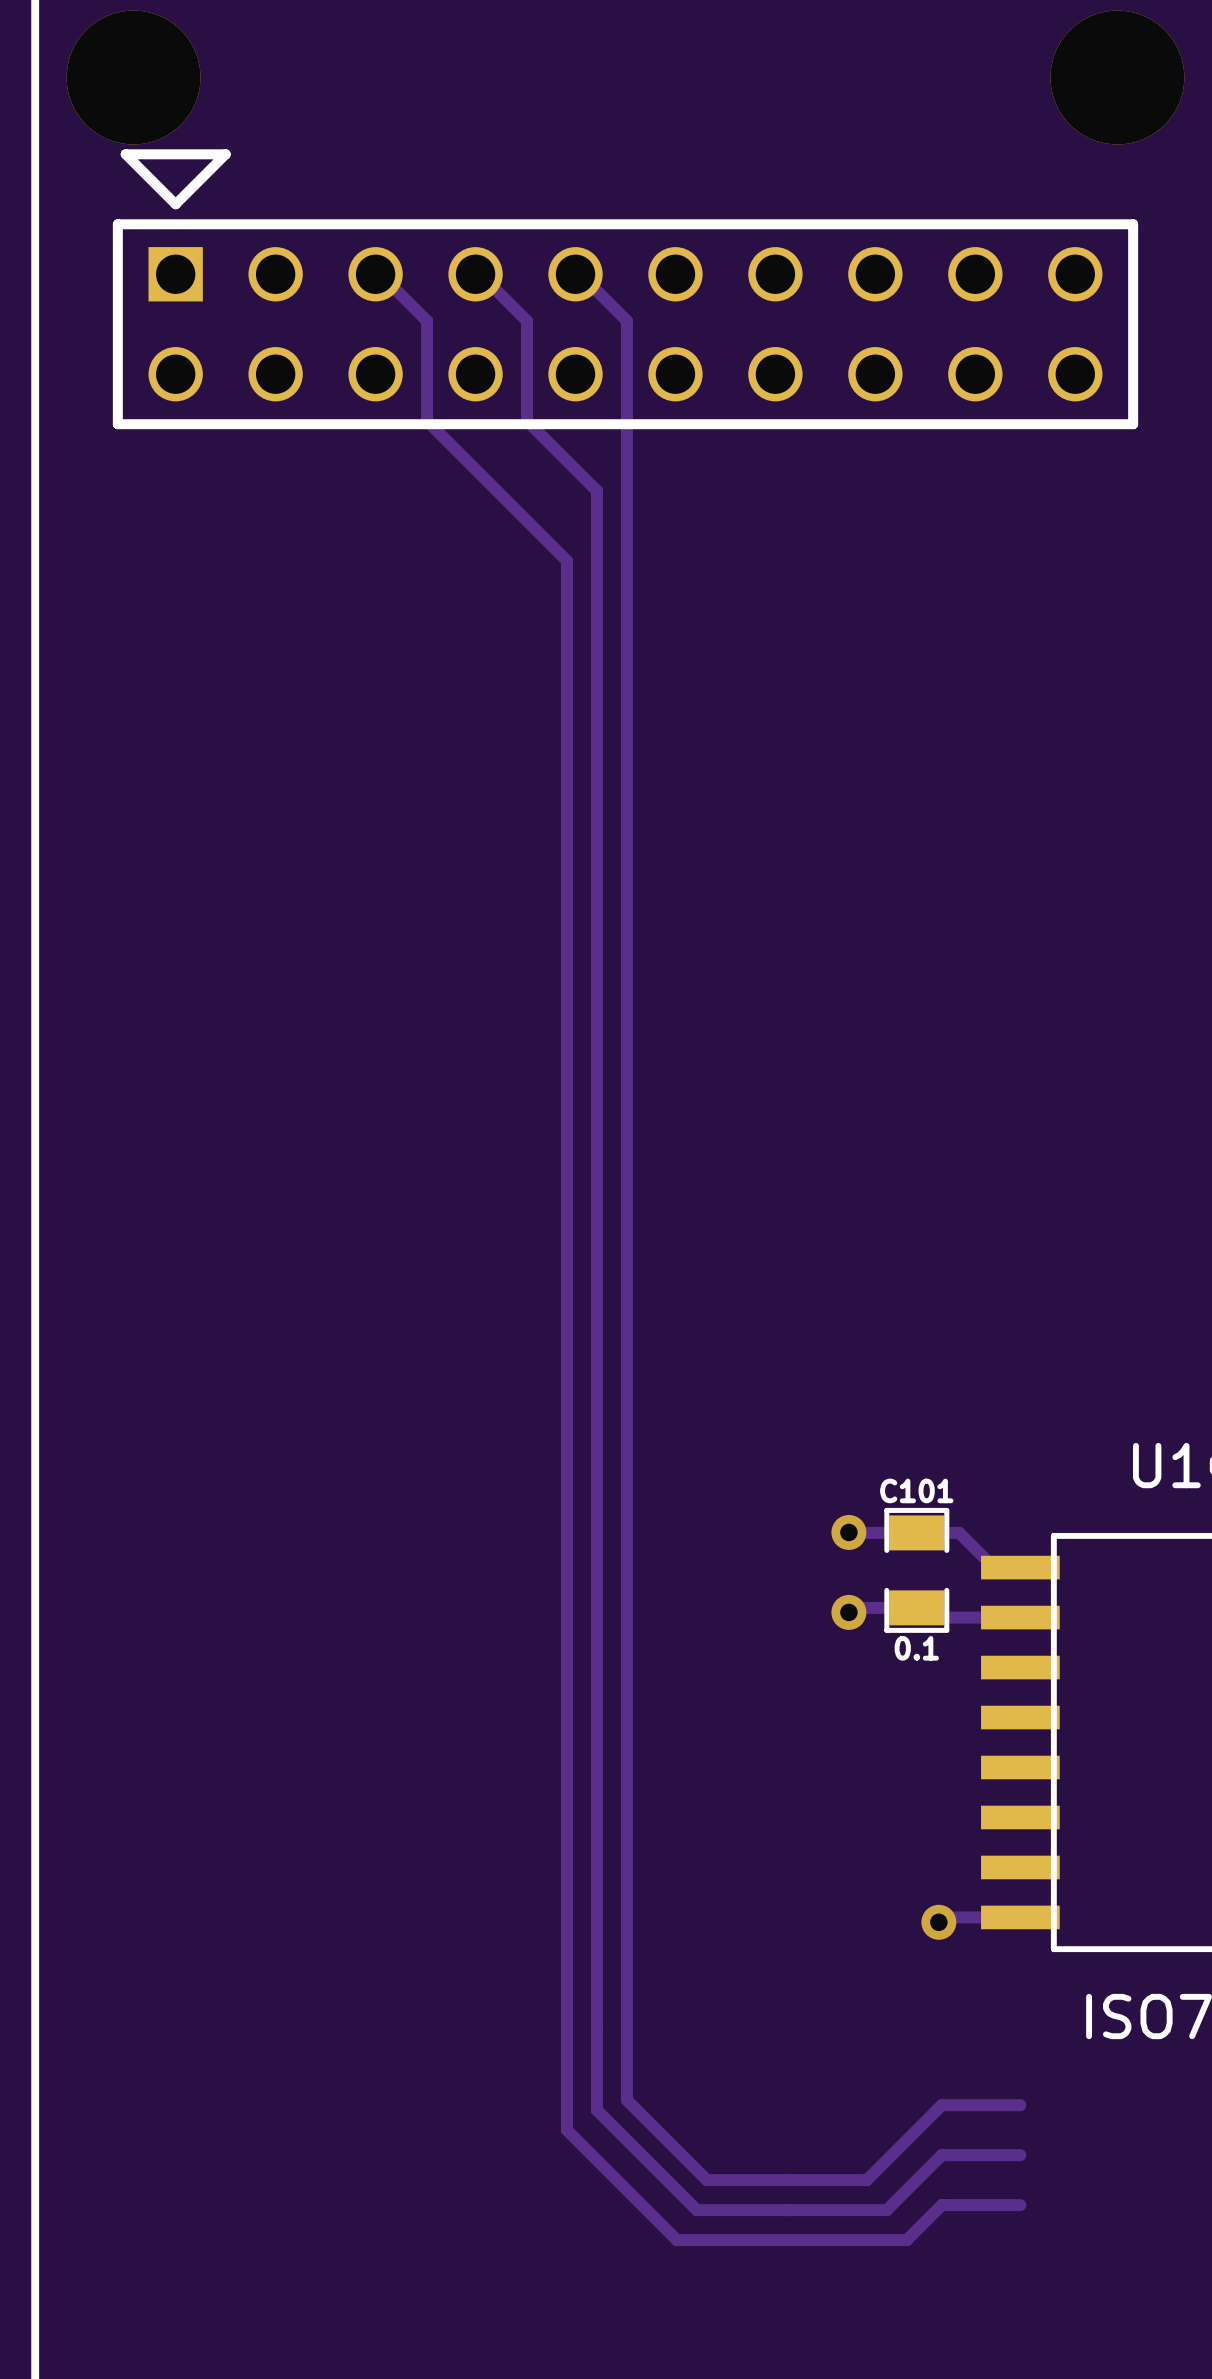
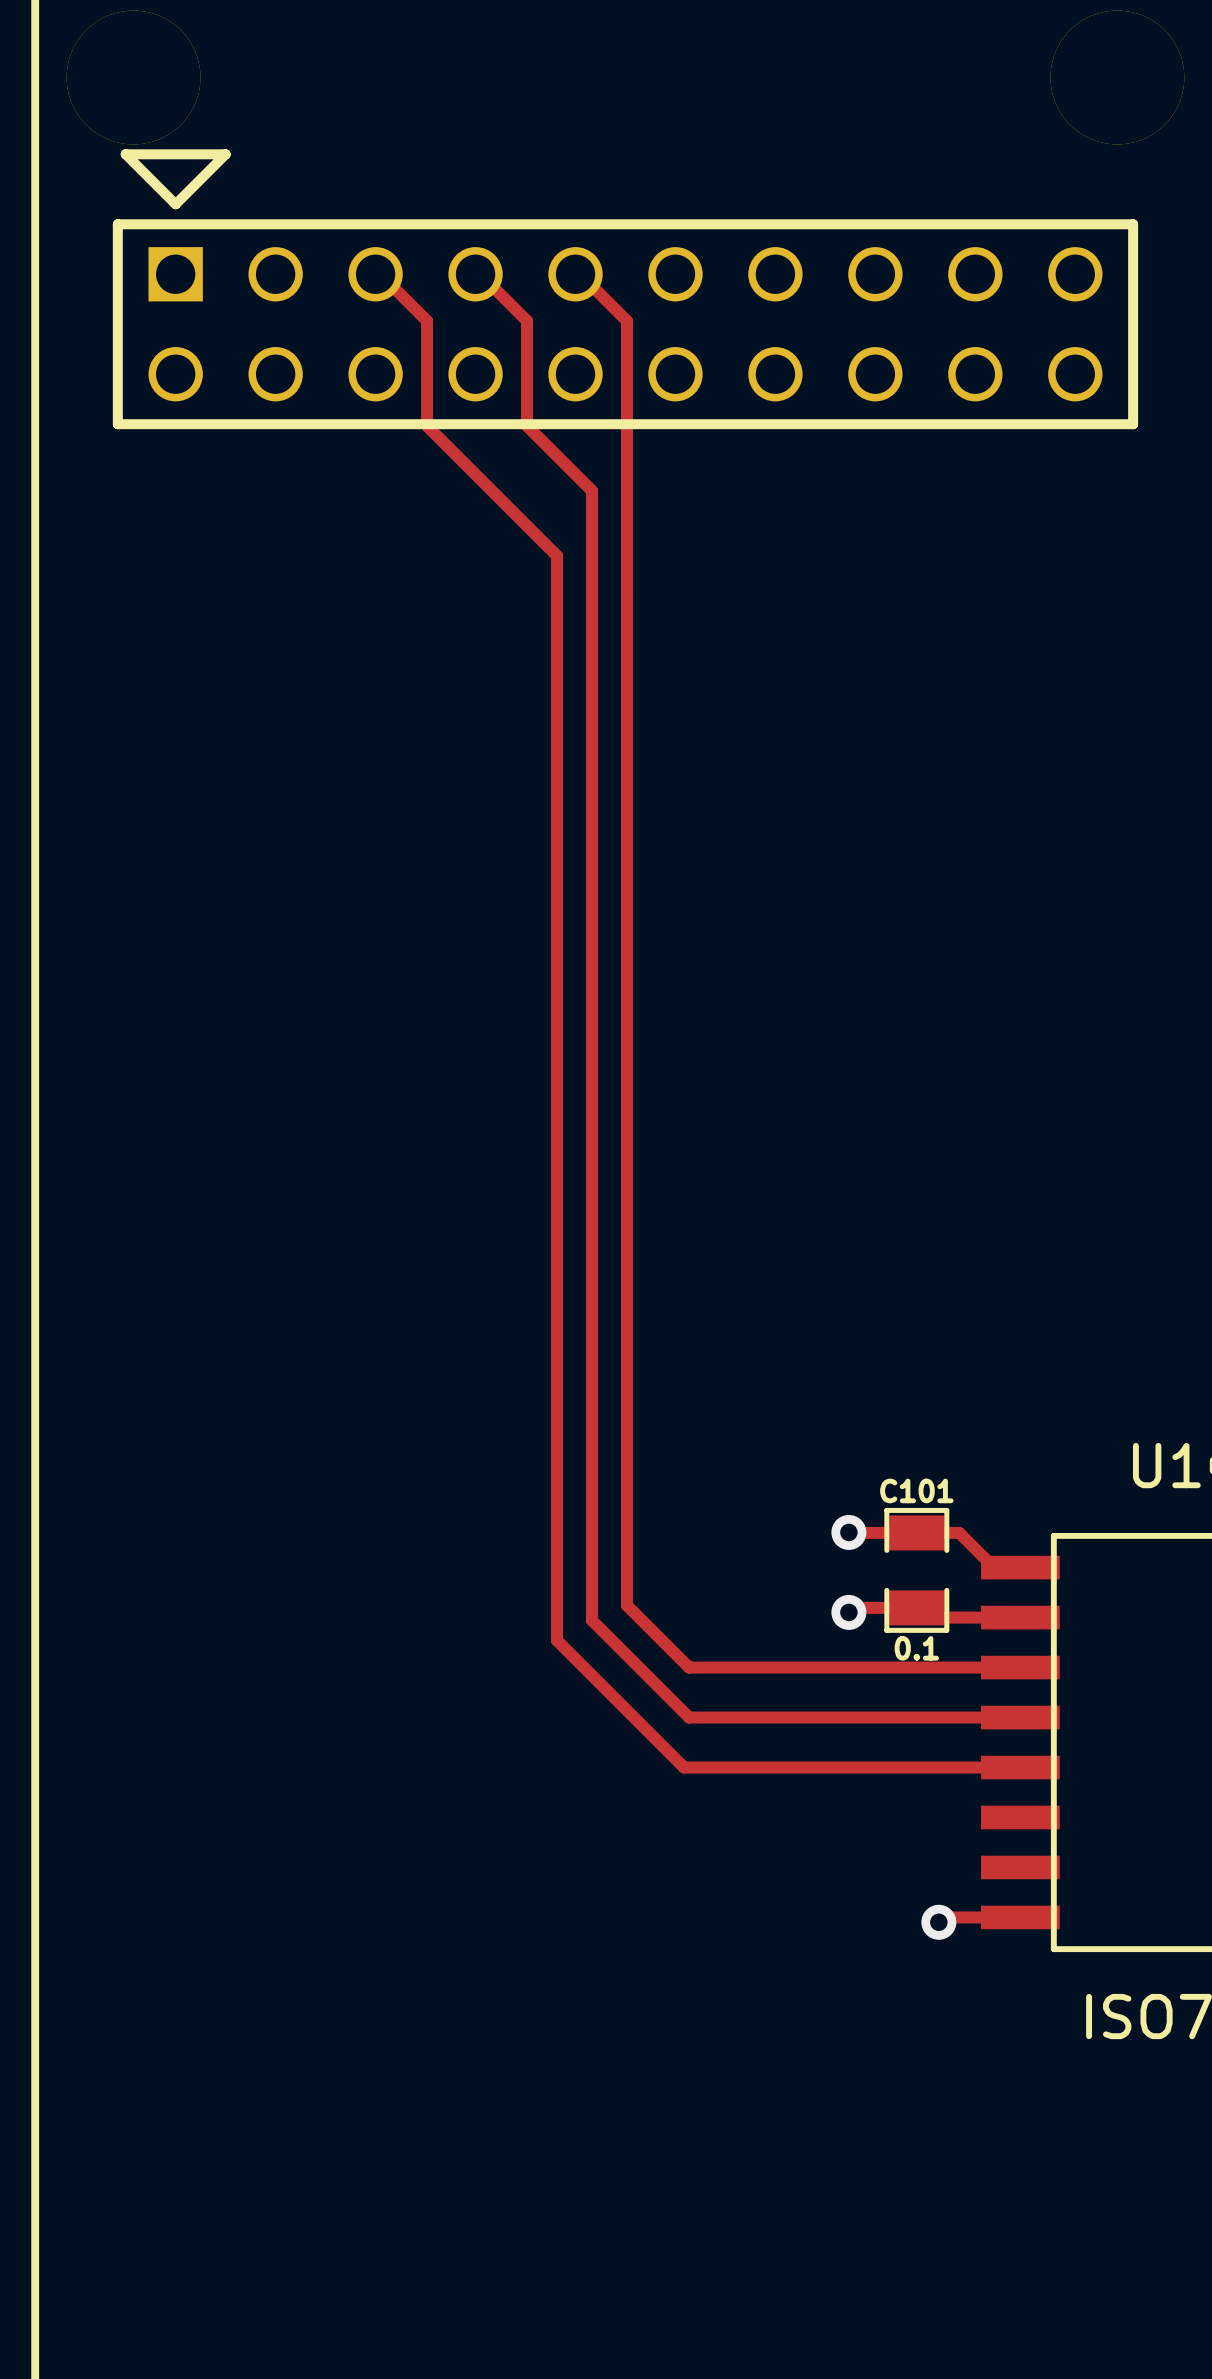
track: (427, 420) (566, 560) (566, 2130) (676, 2240) (906, 2240) (941, 2205) (1020, 2205) -> (427, 420) (427, 425) (557, 555) (557, 1640) (684, 1767) (1020, 1767)
track: (526, 420) (596, 490) (596, 2110) (696, 2210) (886, 2210) (941, 2155) (1020, 2155) -> (526, 420) (527, 425) (592, 490) (592, 1620) (689, 1717) (1020, 1717)
track: (626, 1605) (626, 2100) (706, 2180) (866, 2180) (941, 2105) (1020, 2105) -> (626, 1605) (689, 1667) (1020, 1667)

